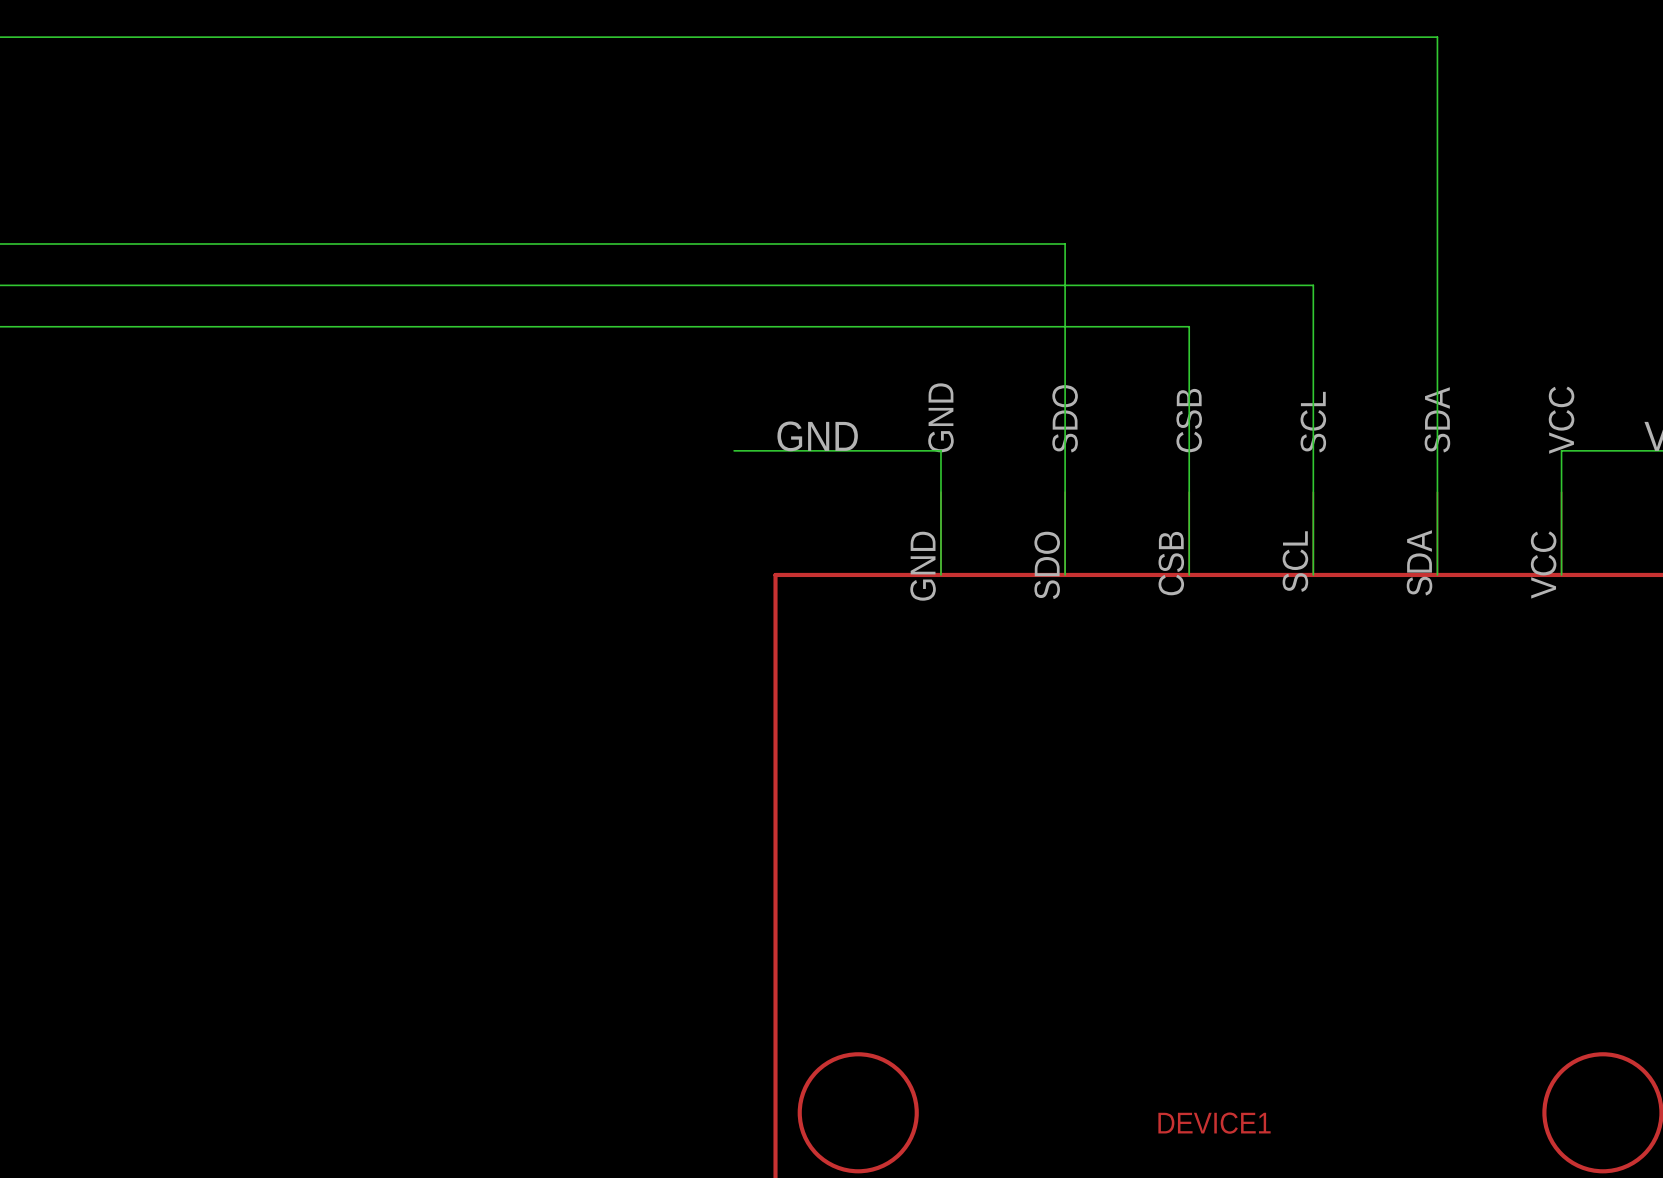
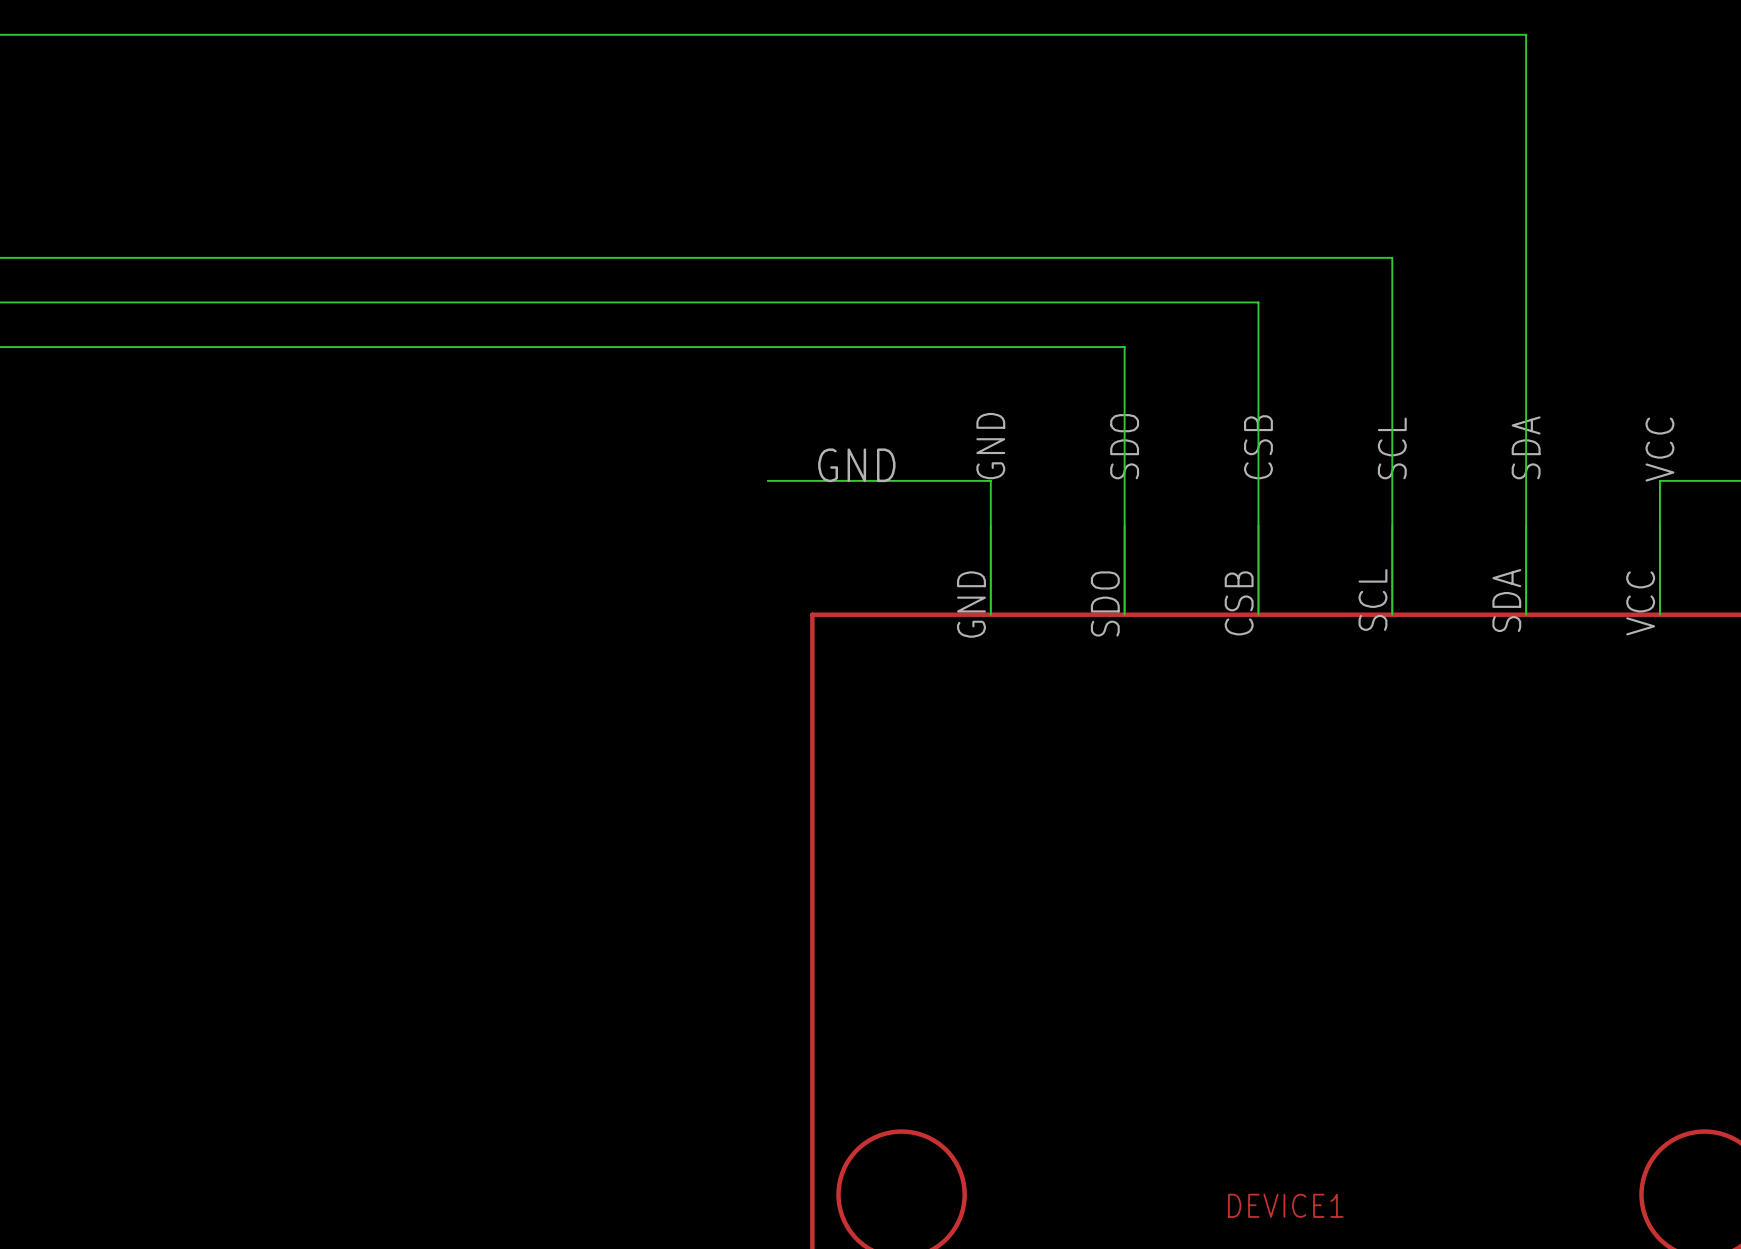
wire: (1065, 244) (1065, 326) (1189, 326) -> (1258, 302) (1258, 347)
wire: (1189, 285) (1313, 285) -> (1124, 257) (1392, 257) (1392, 302)

